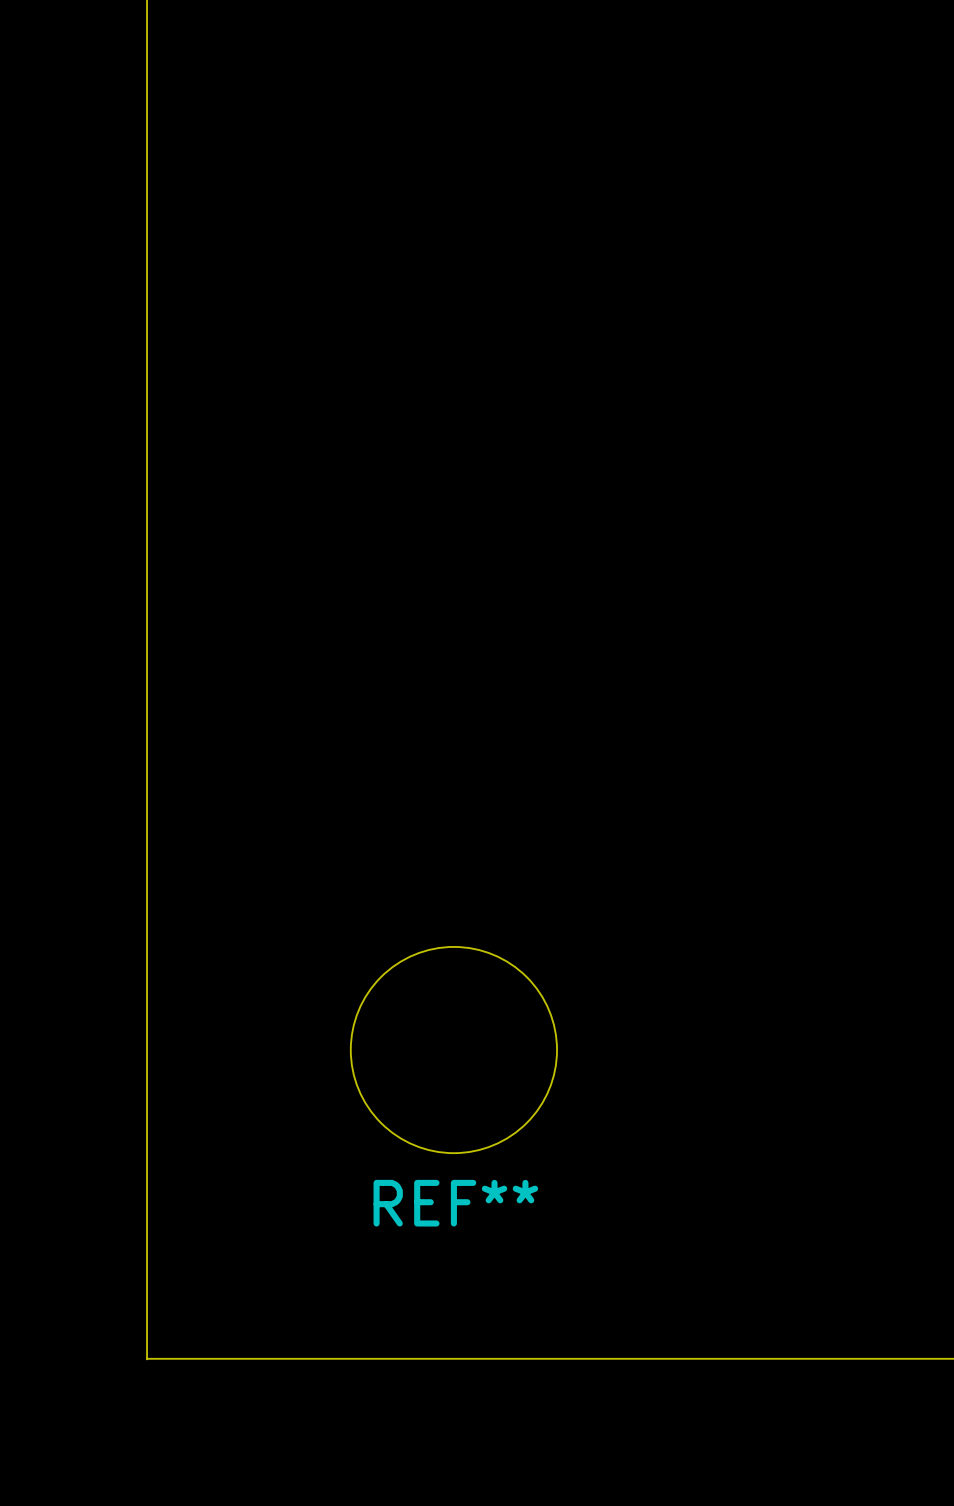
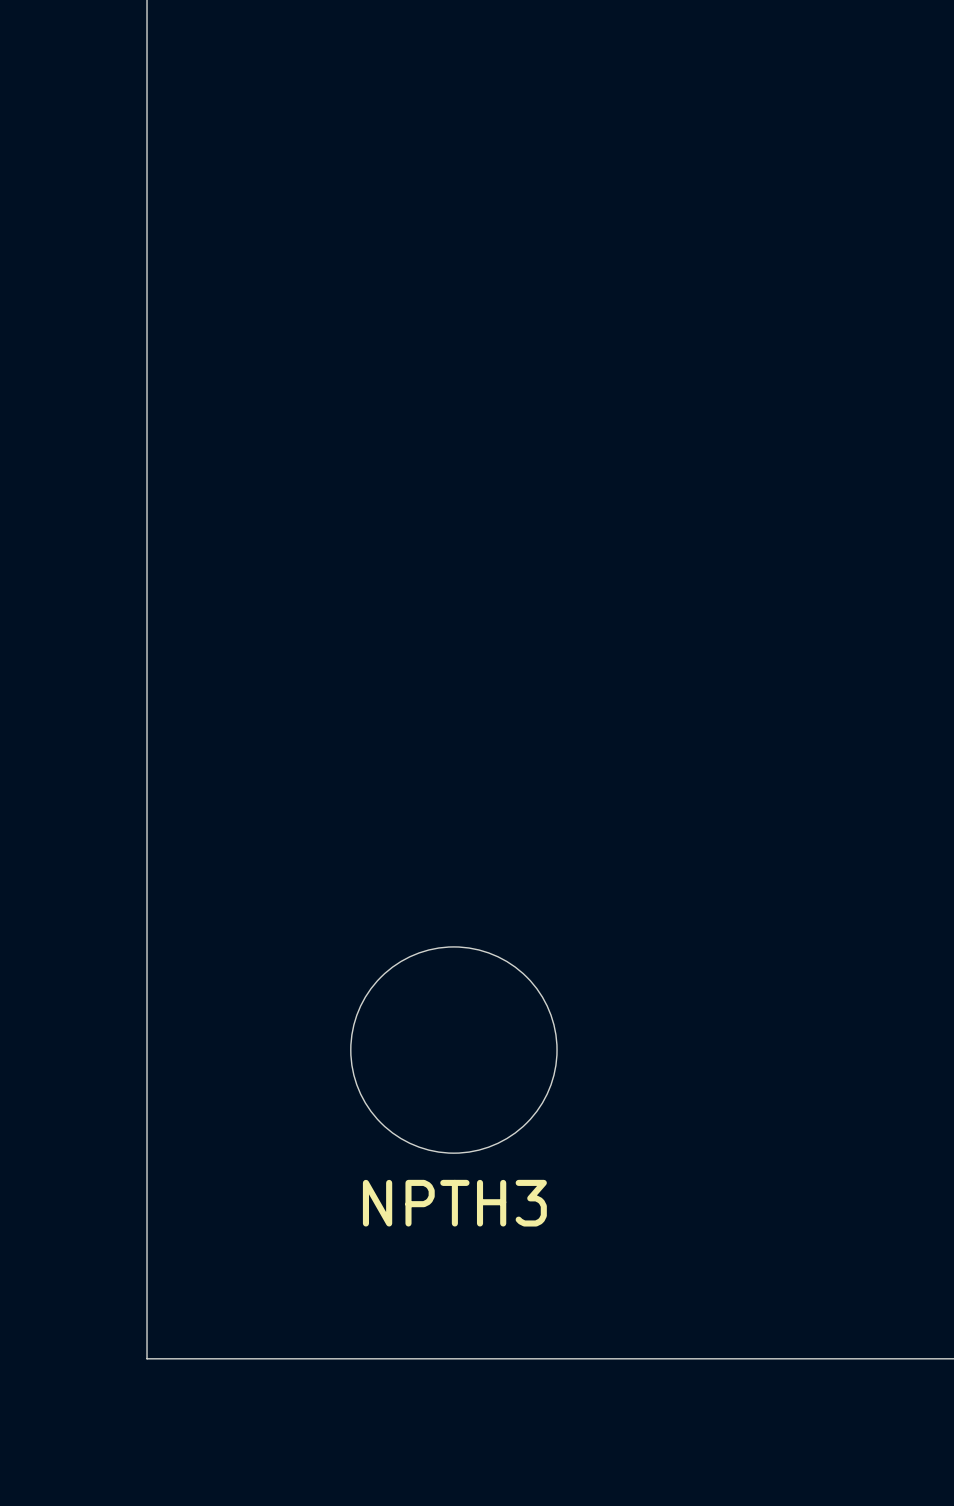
REF** name: REF** (455, 1203) -> NPTH3 (454, 1203)

